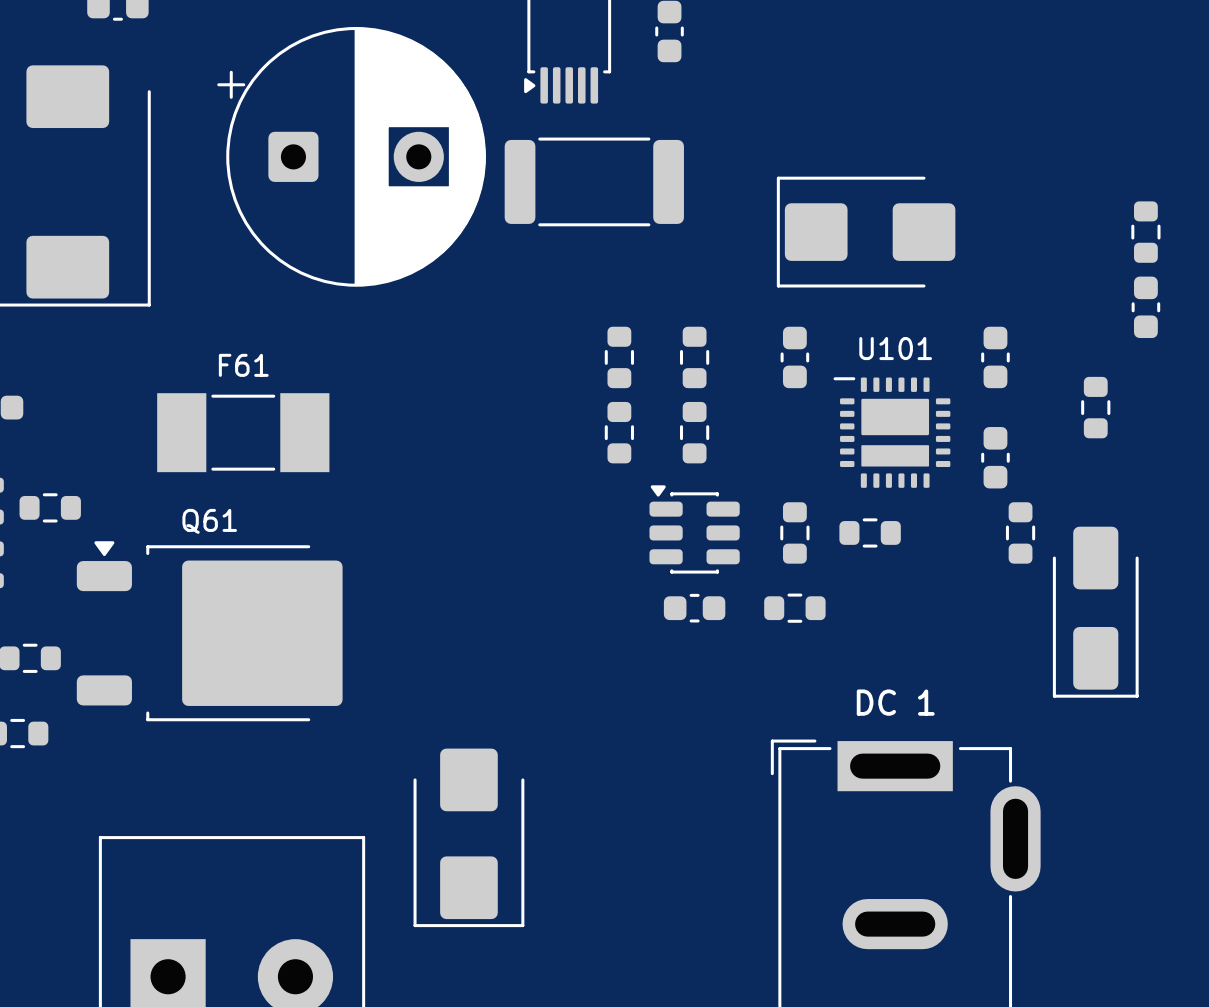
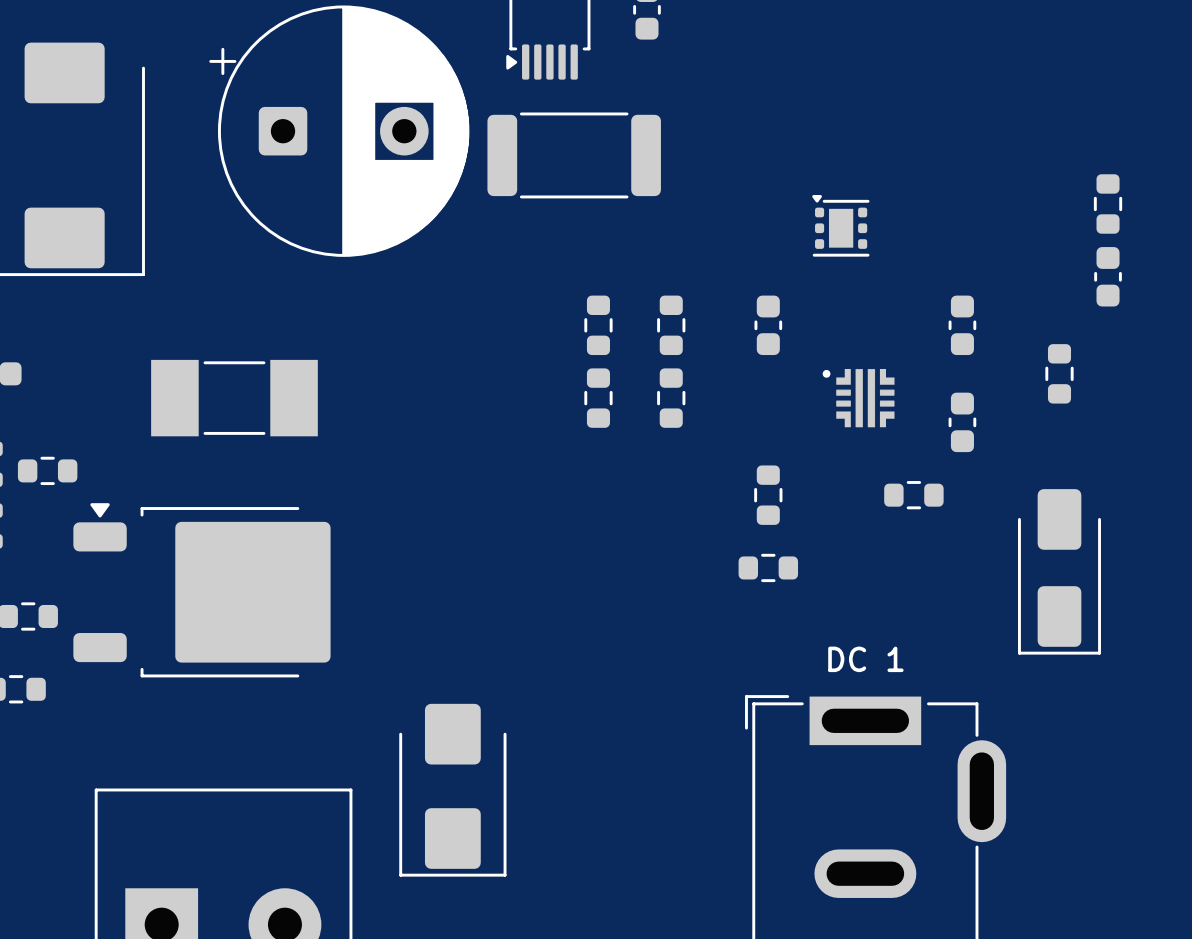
part footprint: [776, 176, 956, 288] -> [812, 195, 870, 257]
F61 name: F61 (243, 365) -> none
part: none -> (858, 398)
U101: (891, 432) -> none
Q61 name: Q61 (209, 521) -> none
part: (694, 529) -> none
part: (870, 532) -> none
part: none -> (913, 495)
part: (1020, 532) -> none
part: (694, 608) -> none

